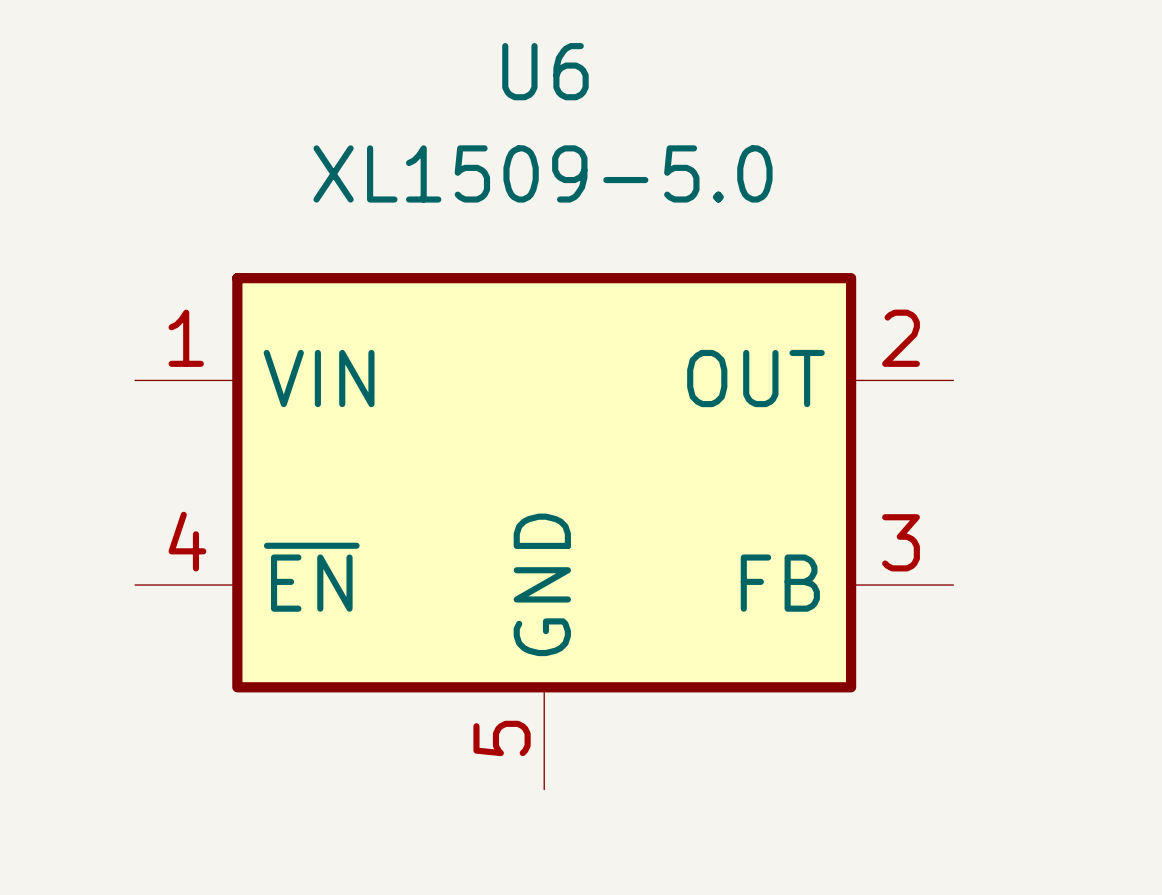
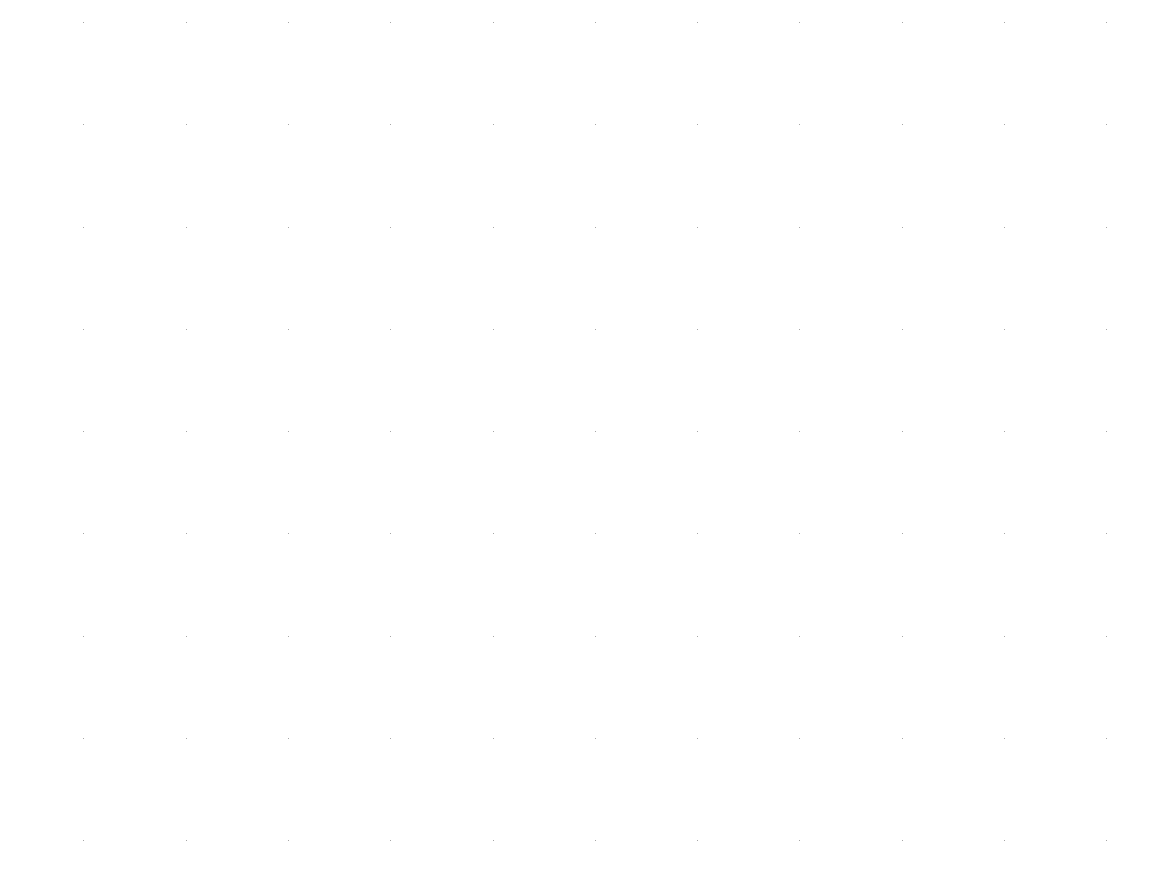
U6: XL1509-5.0 (544, 531) -> none

